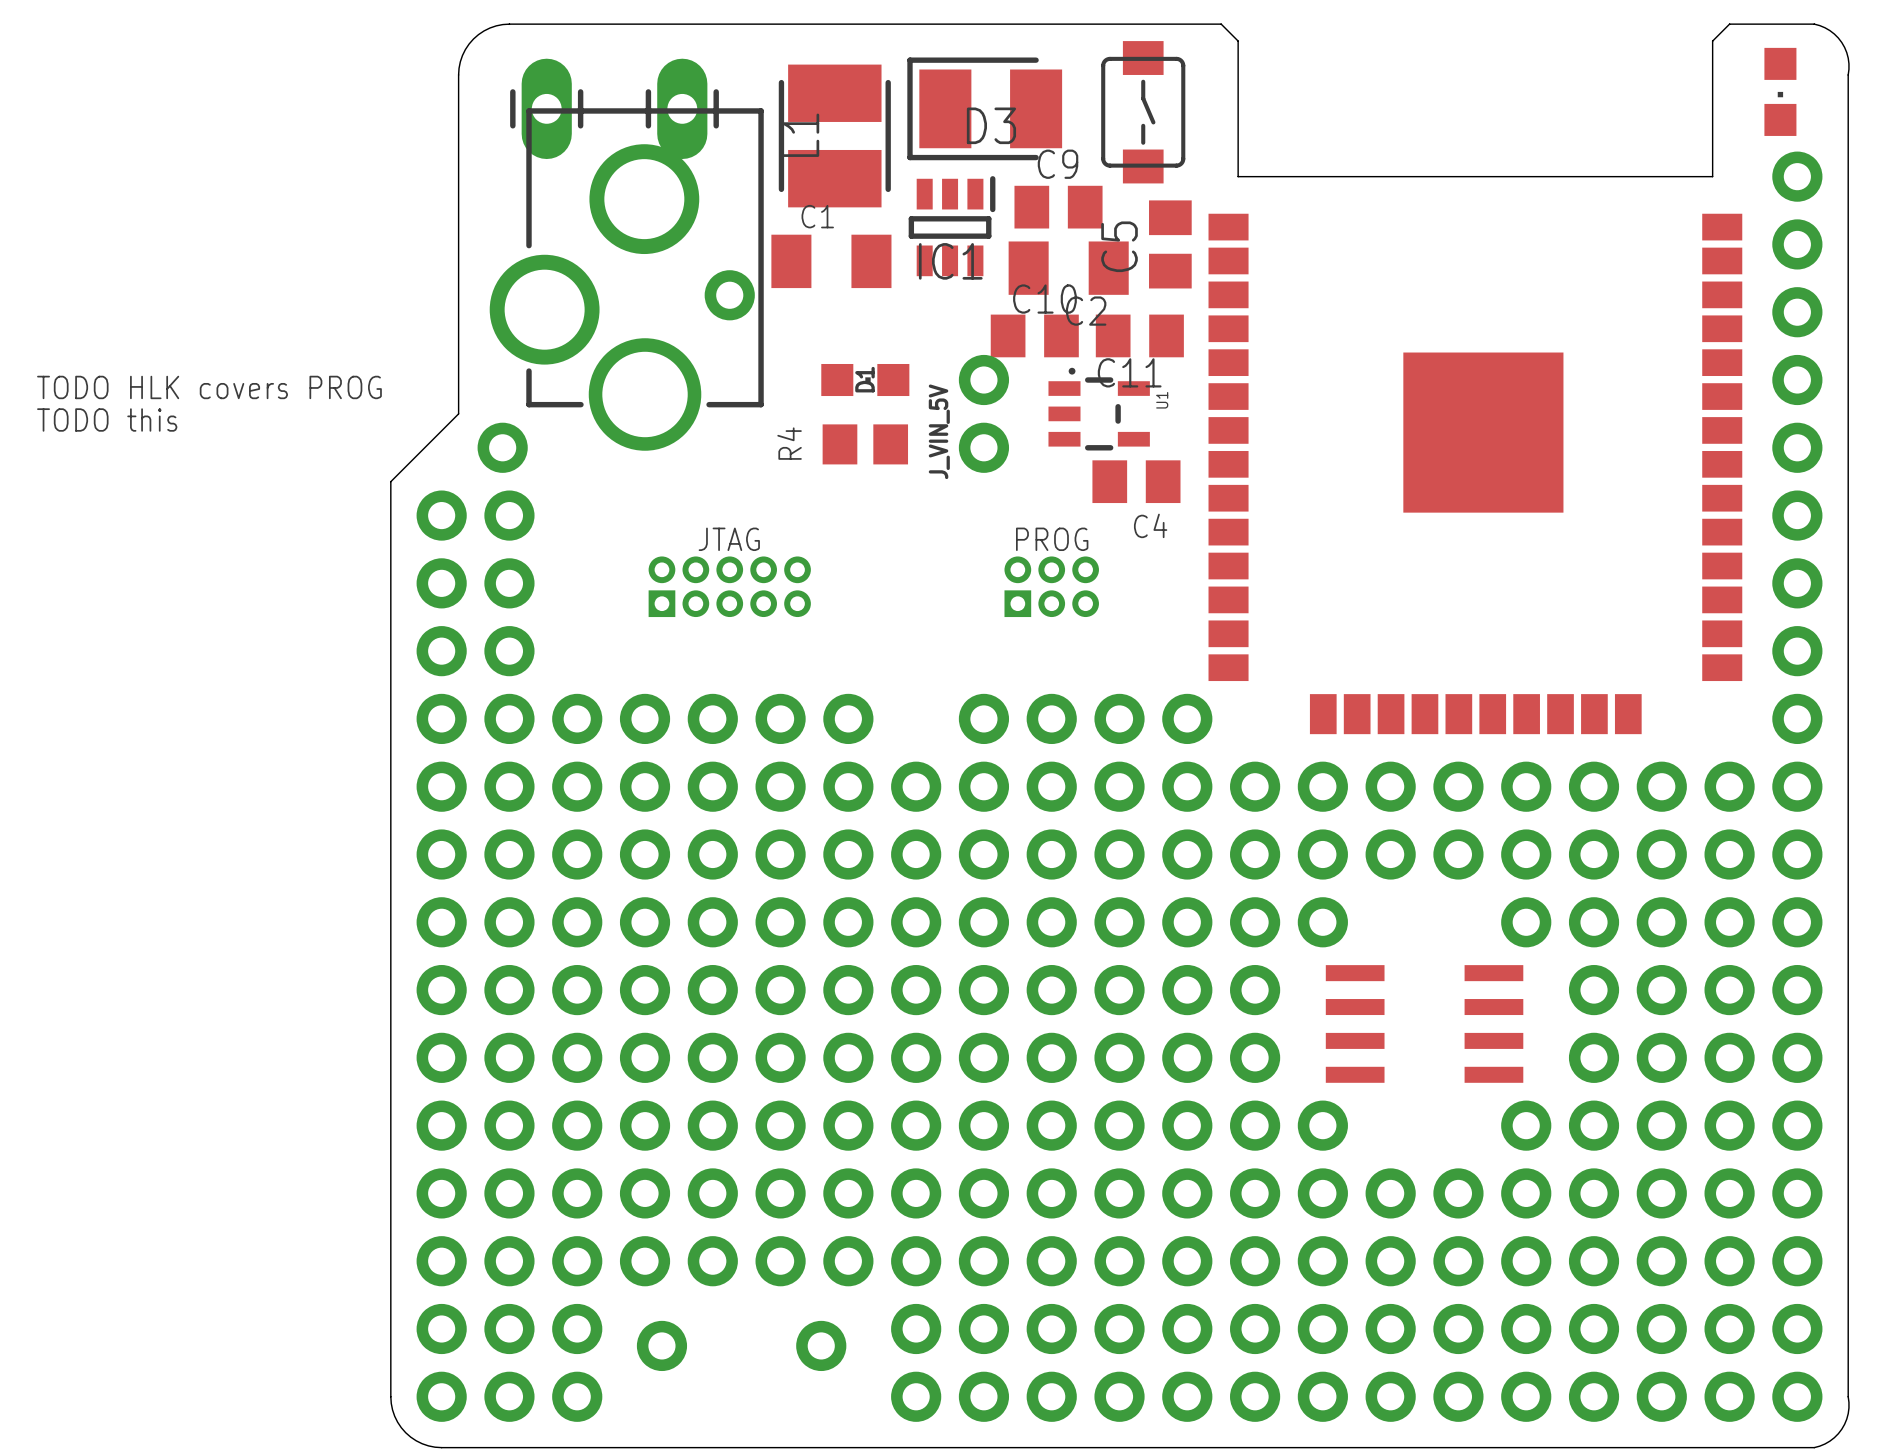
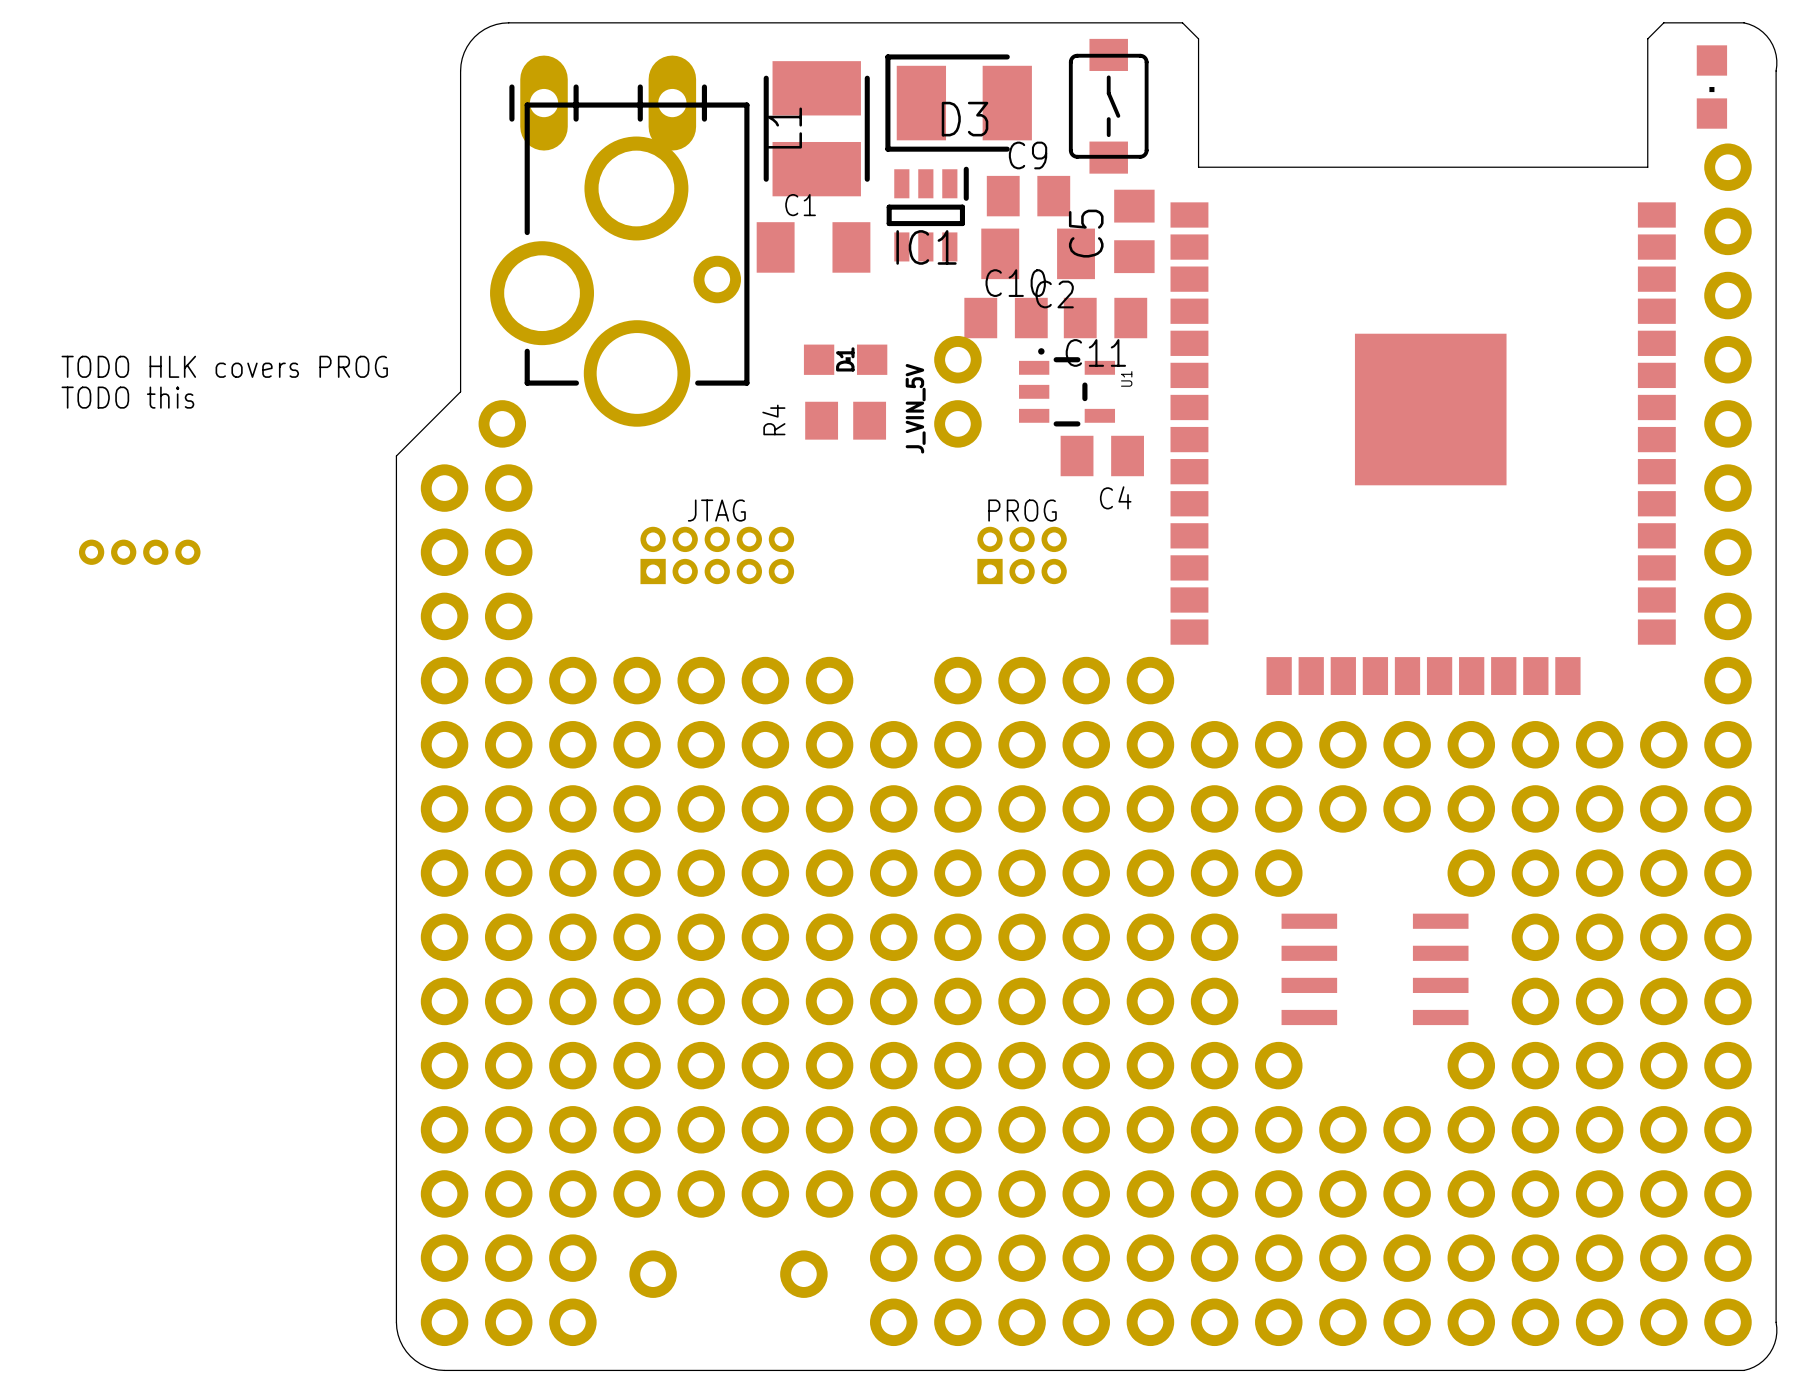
part: none -> (139, 552)

